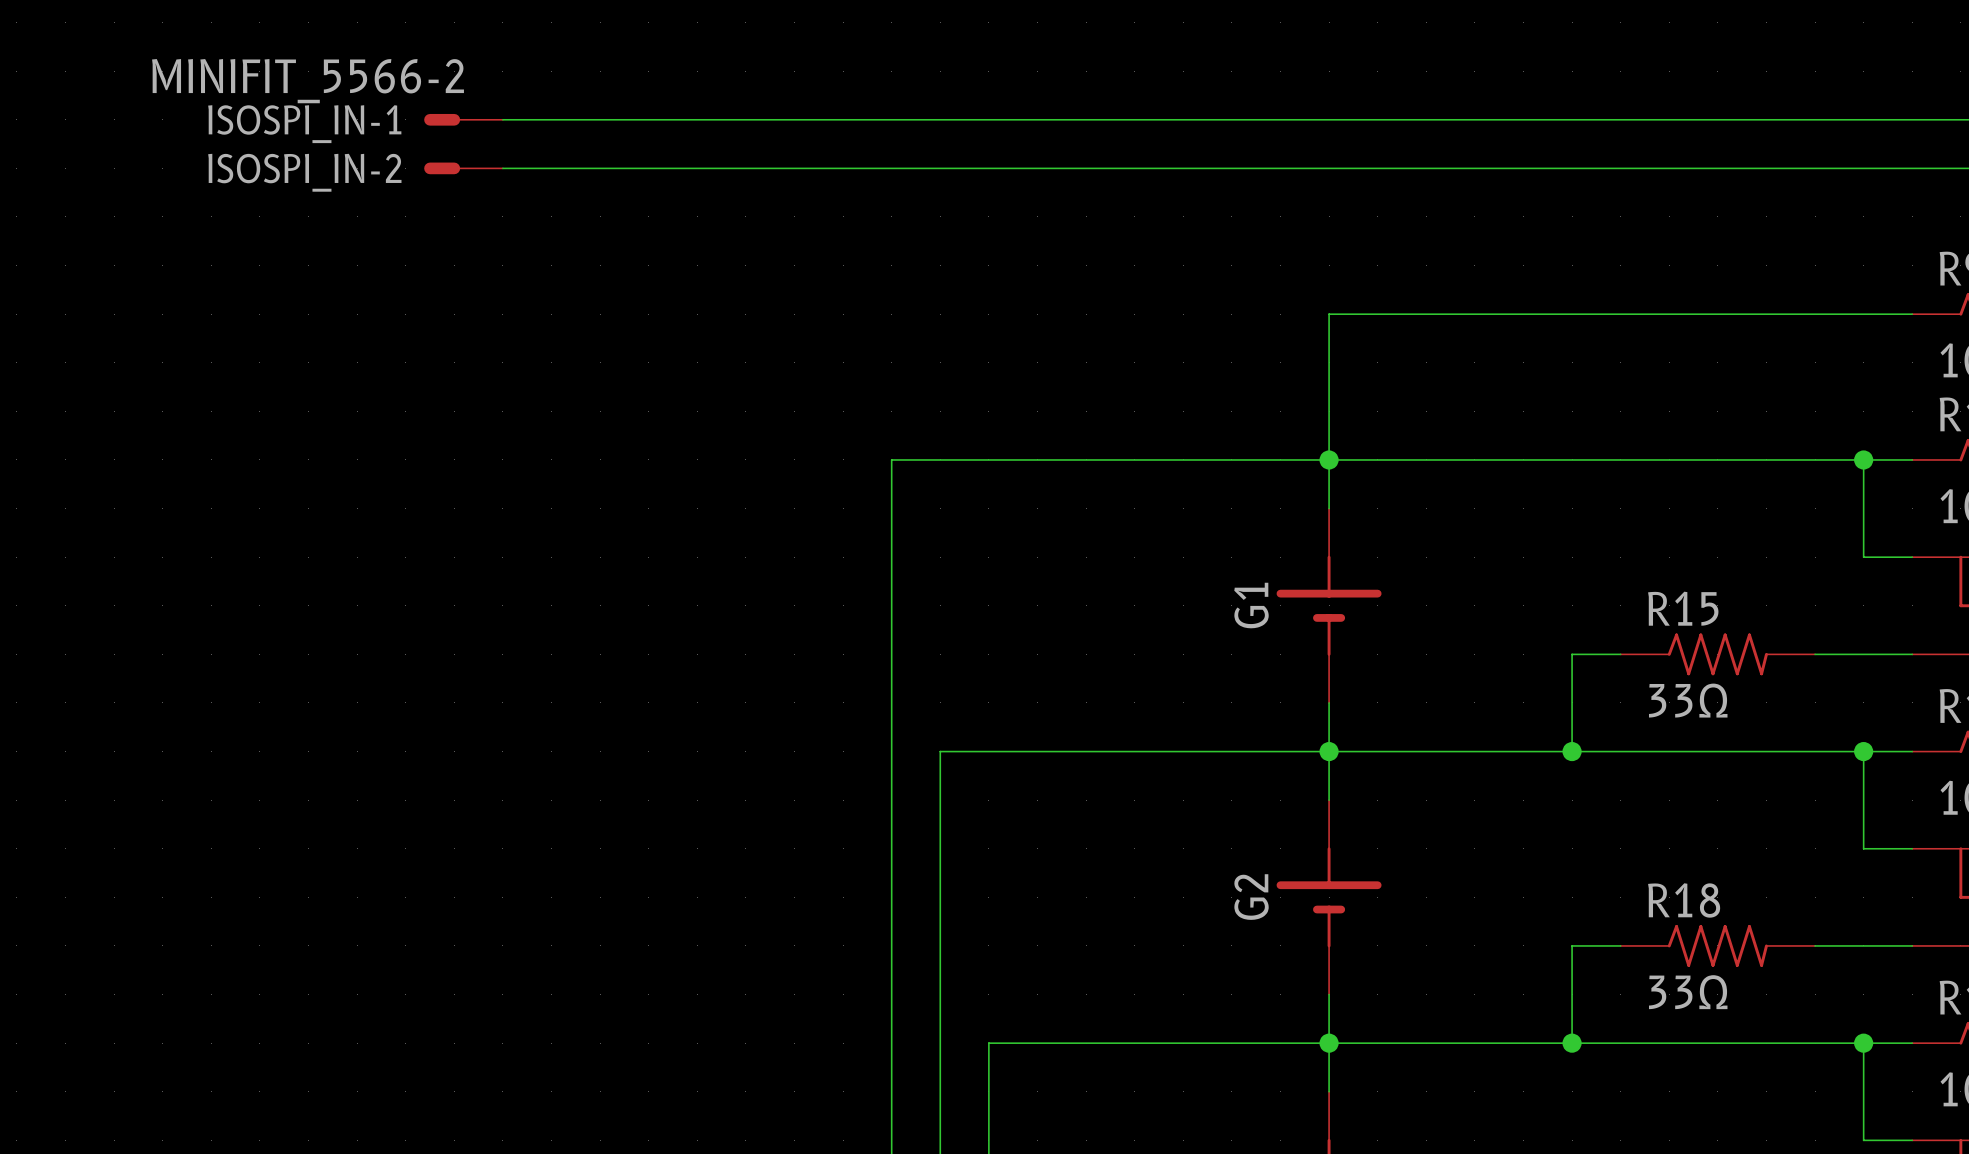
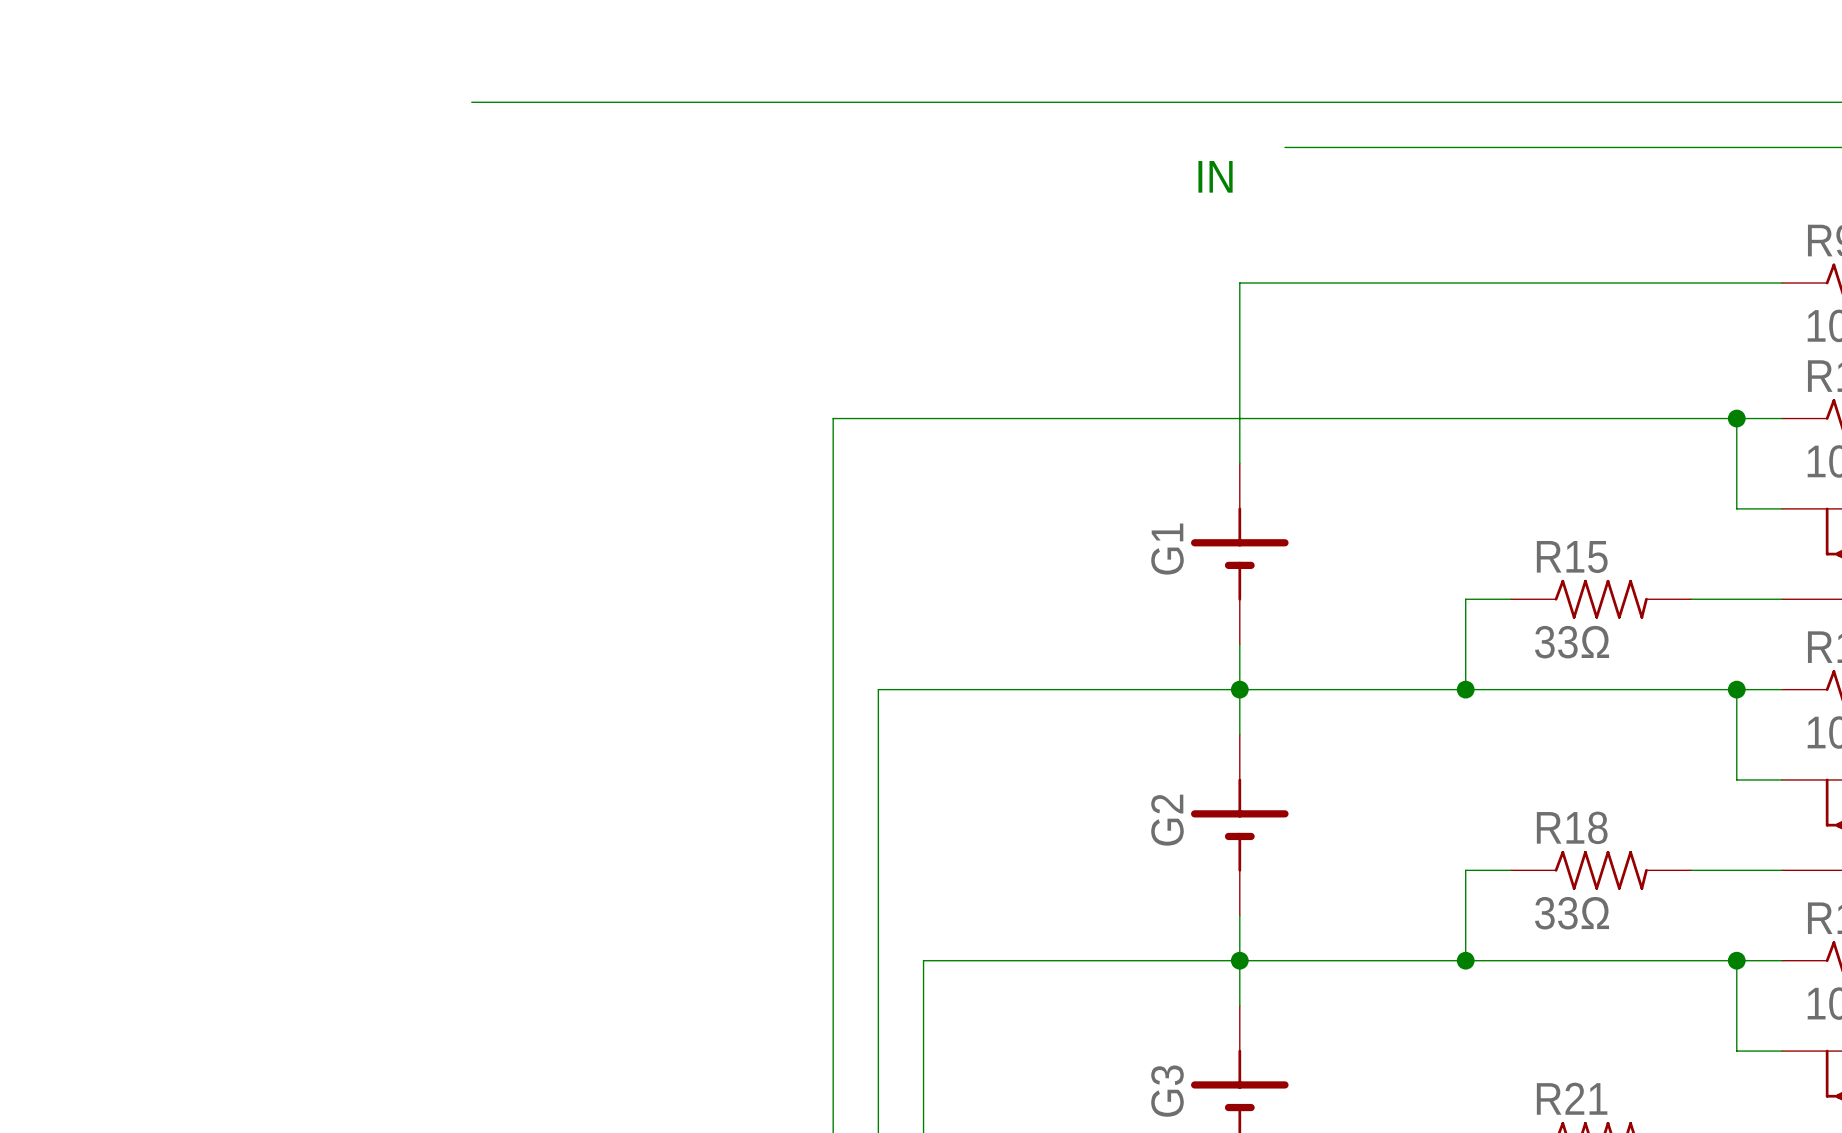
ISOSPI_IN-1: MINIFIT_5566-2 (463, 119) -> none
ISOSPI_IN-2: (463, 168) -> none
wire: (502, 168) (1377, 168) -> none
text: none -> IN (1215, 176)
junction: (1329, 459) -> none

